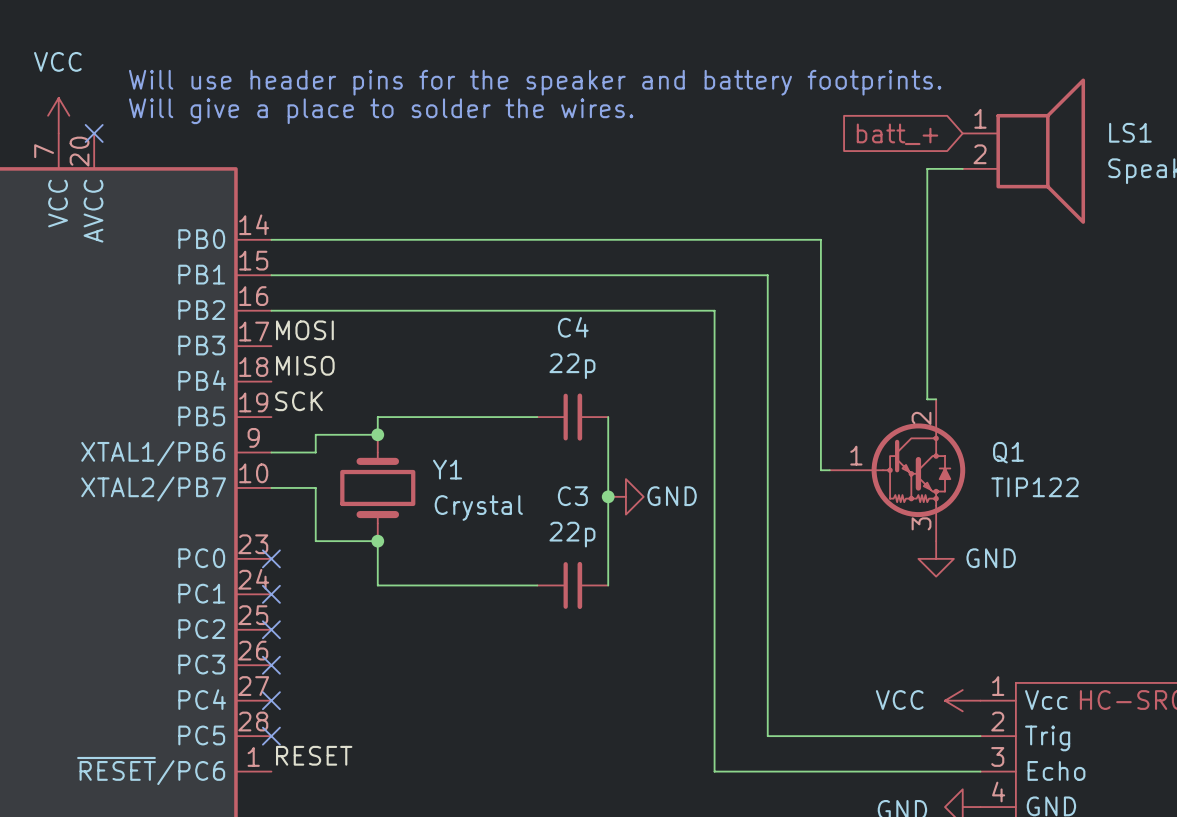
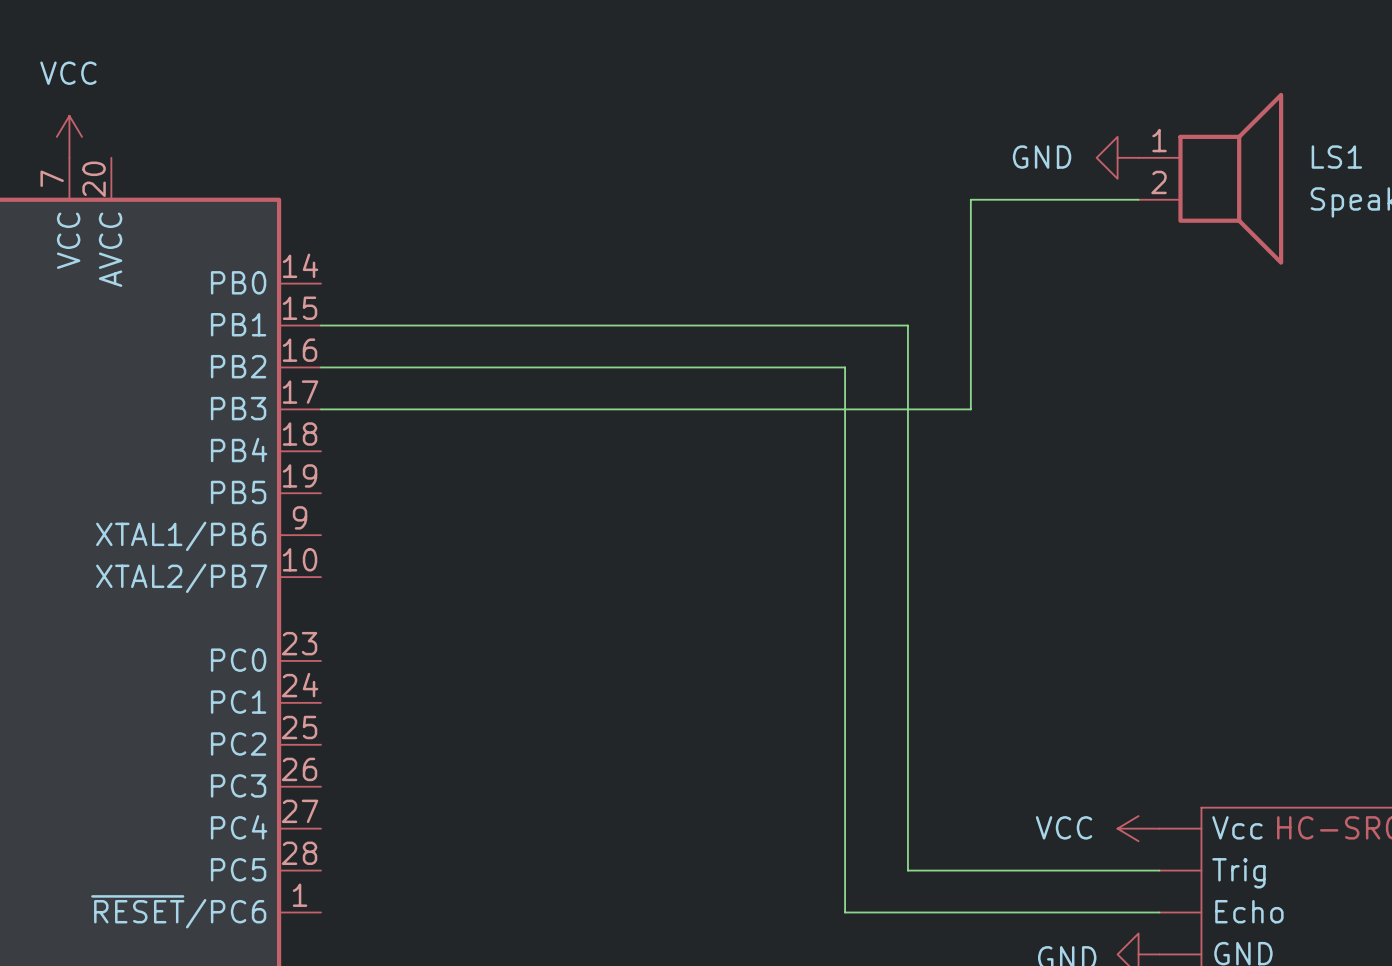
text: Will use header pins for the speaker and battery footprints. (535, 82) -> none
text: Will give a place to solder the wires. (381, 111) -> none
no-connect mark: (94, 133) -> none
power symbol: none -> GND (1117, 157)
global label: batt_+ (897, 134) -> none
wire: (927, 168) (927, 399) (936, 399) -> (1096, 199) (970, 199) (970, 283)
wire: (271, 239) (820, 239) -> none
label: MOSI (304, 330) -> none
wire: (820, 346) (820, 470) (829, 470) -> (970, 409) (320, 409)
label: MISO (305, 365) -> none
label: SCK (298, 401) -> none
wire: (537, 417) (377, 417) (377, 434) (315, 434) (315, 452) (271, 452) -> none
C4: 22p (572, 417) -> none
wire: (608, 417) (608, 585) -> none
junction: (377, 434) -> none
Q1: TIP122 (897, 470) -> none
wire: (271, 487) (315, 487) (315, 541) (377, 541) (377, 585) (537, 585) -> none
Y1: Crystal (377, 487) -> none
junction: (608, 496) -> none
power symbol: GND (625, 496) -> none
junction: (377, 541) -> none
no-connect mark: (271, 558) -> none
power symbol: GND (936, 558) -> none
C3: 22p (572, 585) -> none
no-connect mark: (271, 594) -> none
no-connect mark: (271, 629) -> none
no-connect mark: (271, 665) -> none
part pin number: 1 (998, 686) -> none
no-connect mark: (271, 700) -> none
part pin number: 2 (997, 721) -> none
no-connect mark: (271, 736) -> none
label: RESET (314, 755) -> none
part pin number: 3 (997, 756) -> none
part pin number: 4 (998, 791) -> none

